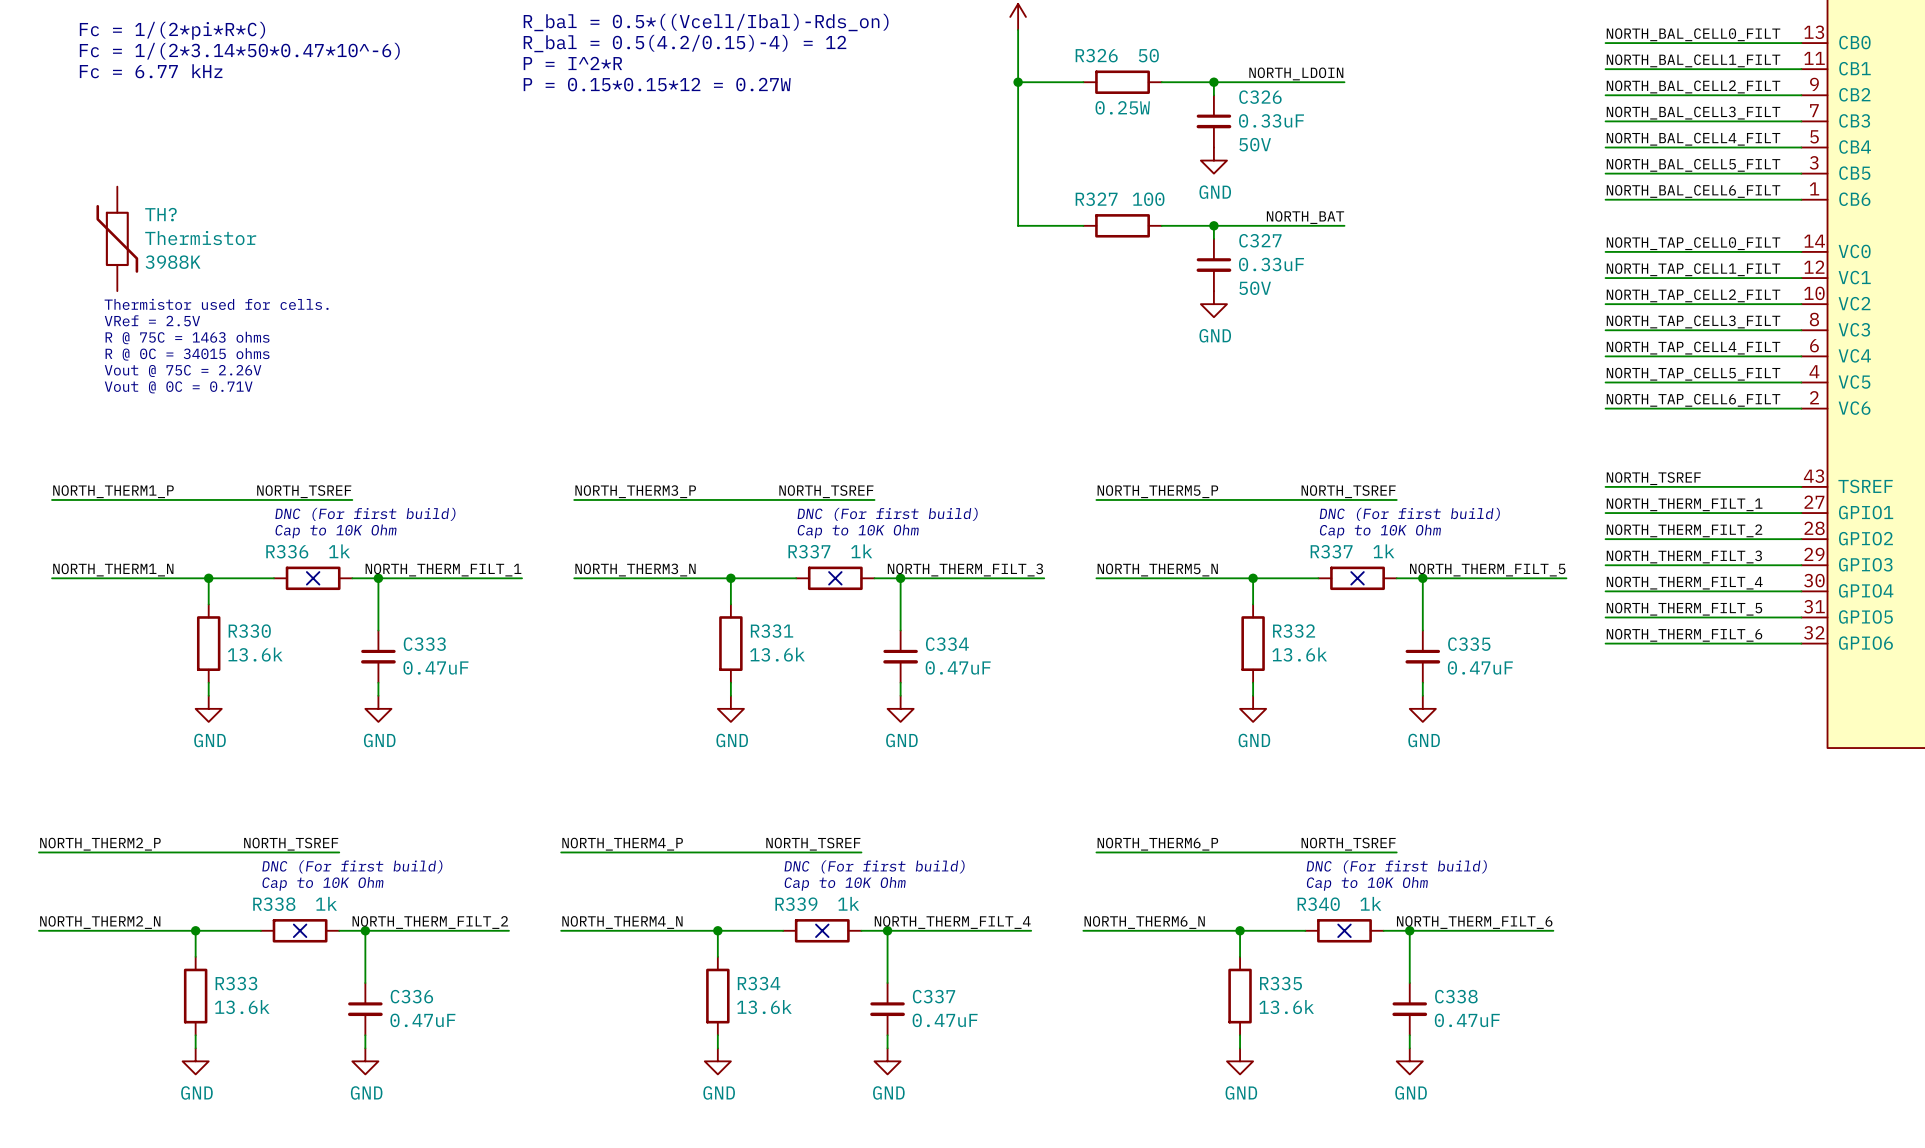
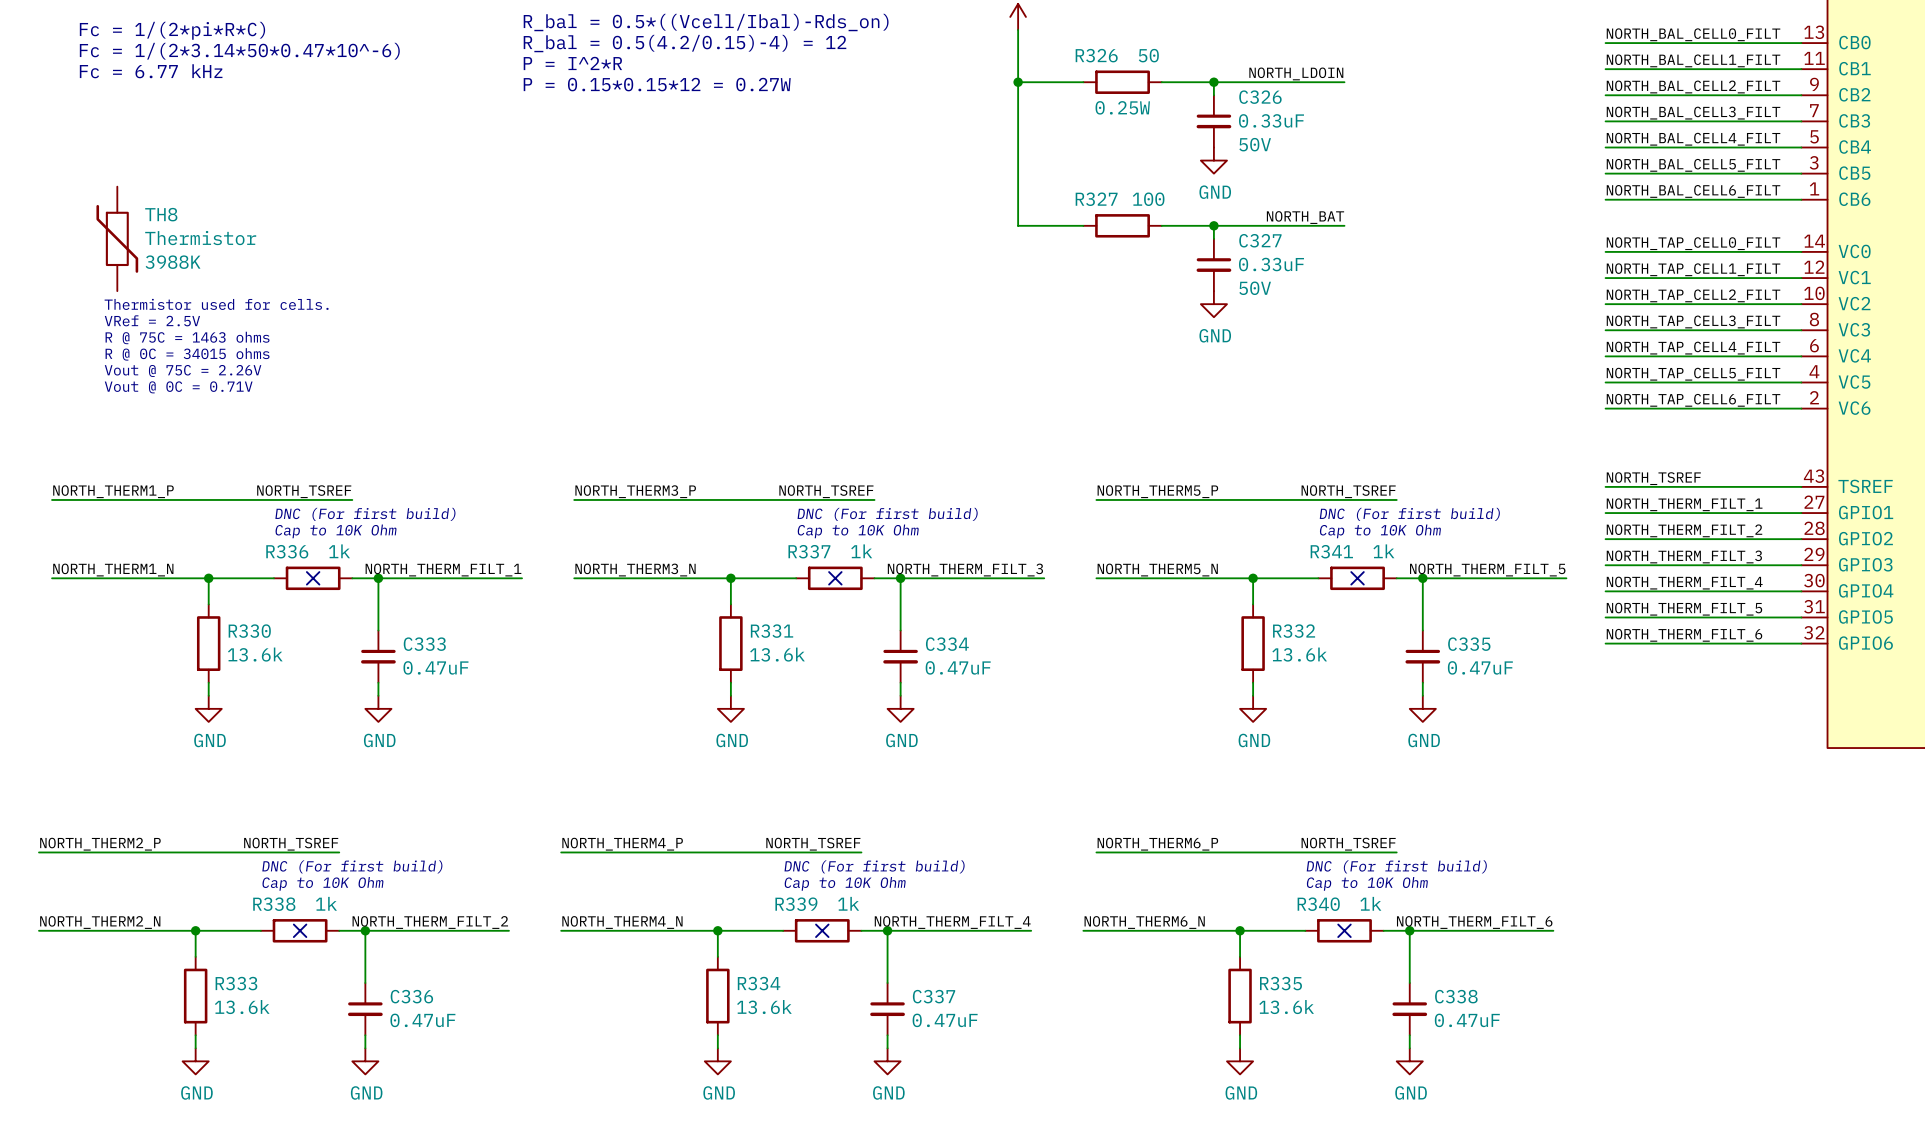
TH? name: TH? (160, 214) -> TH8 (161, 214)
R337 name: R337 (1331, 551) -> R341 (1331, 551)

